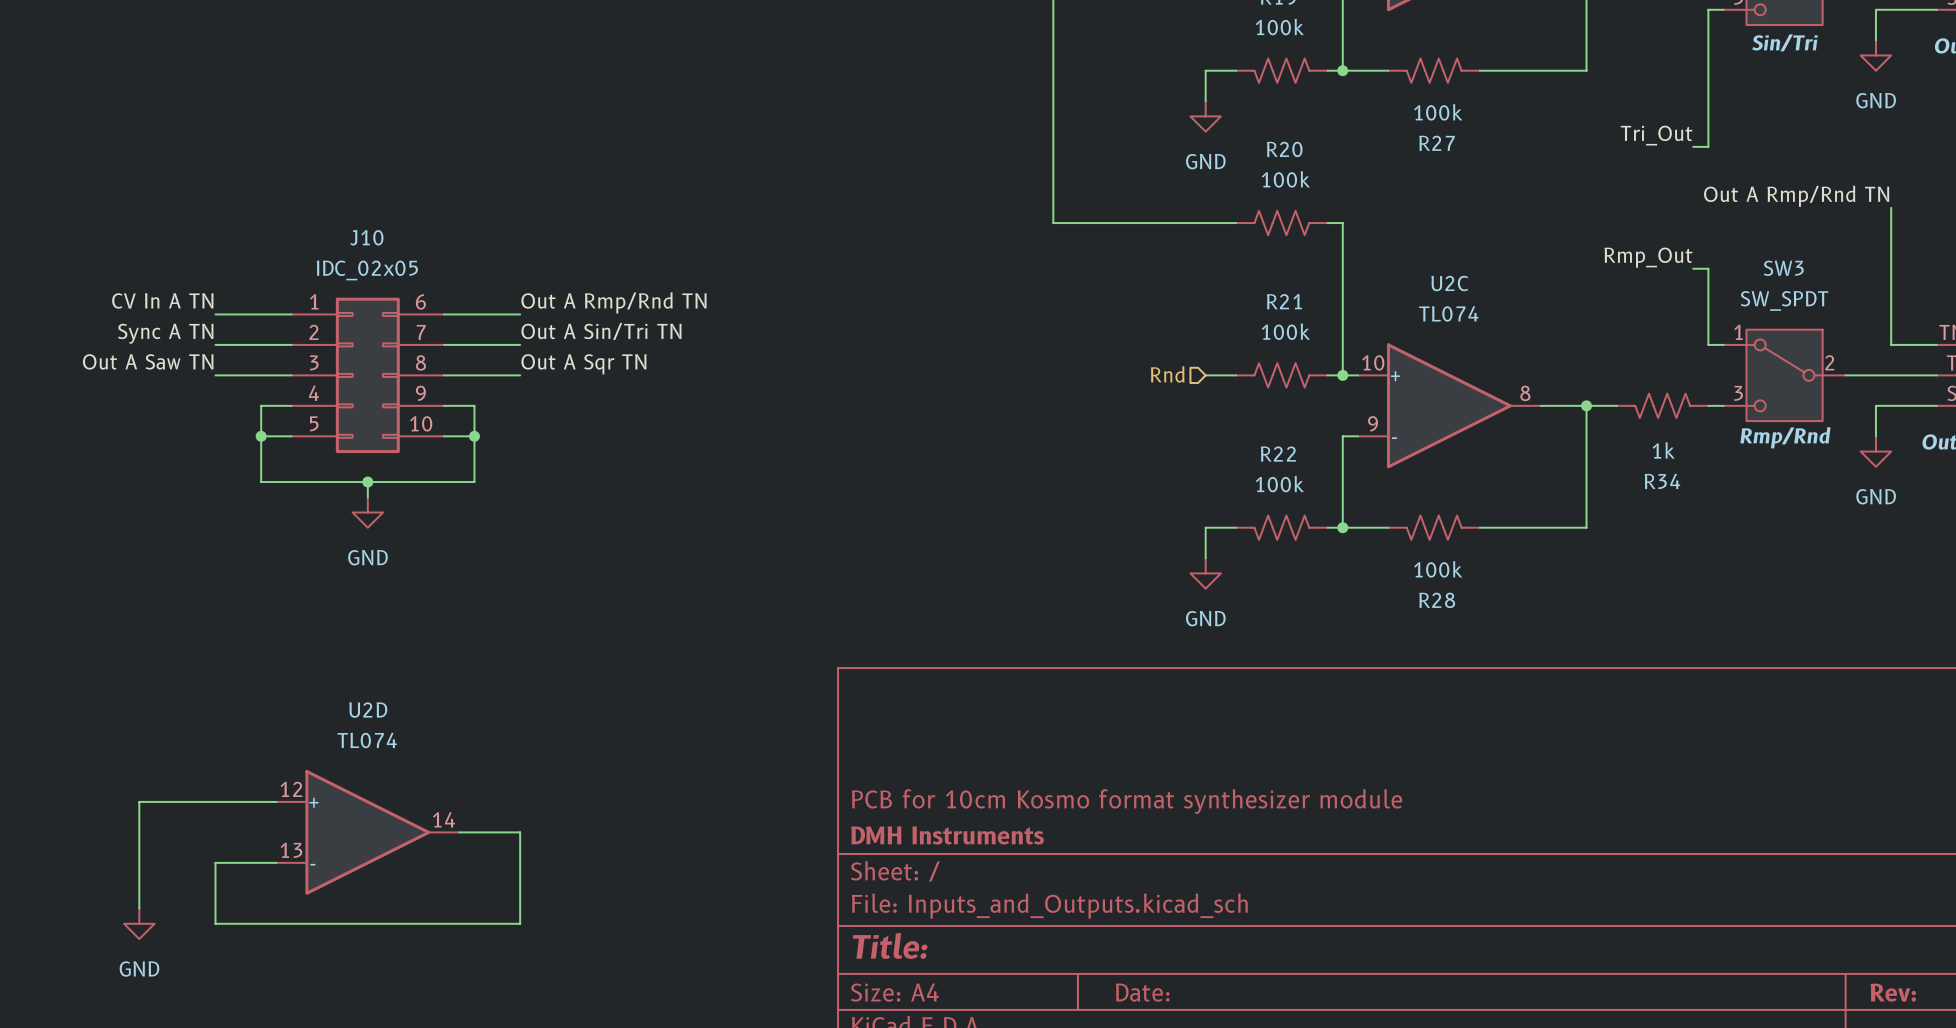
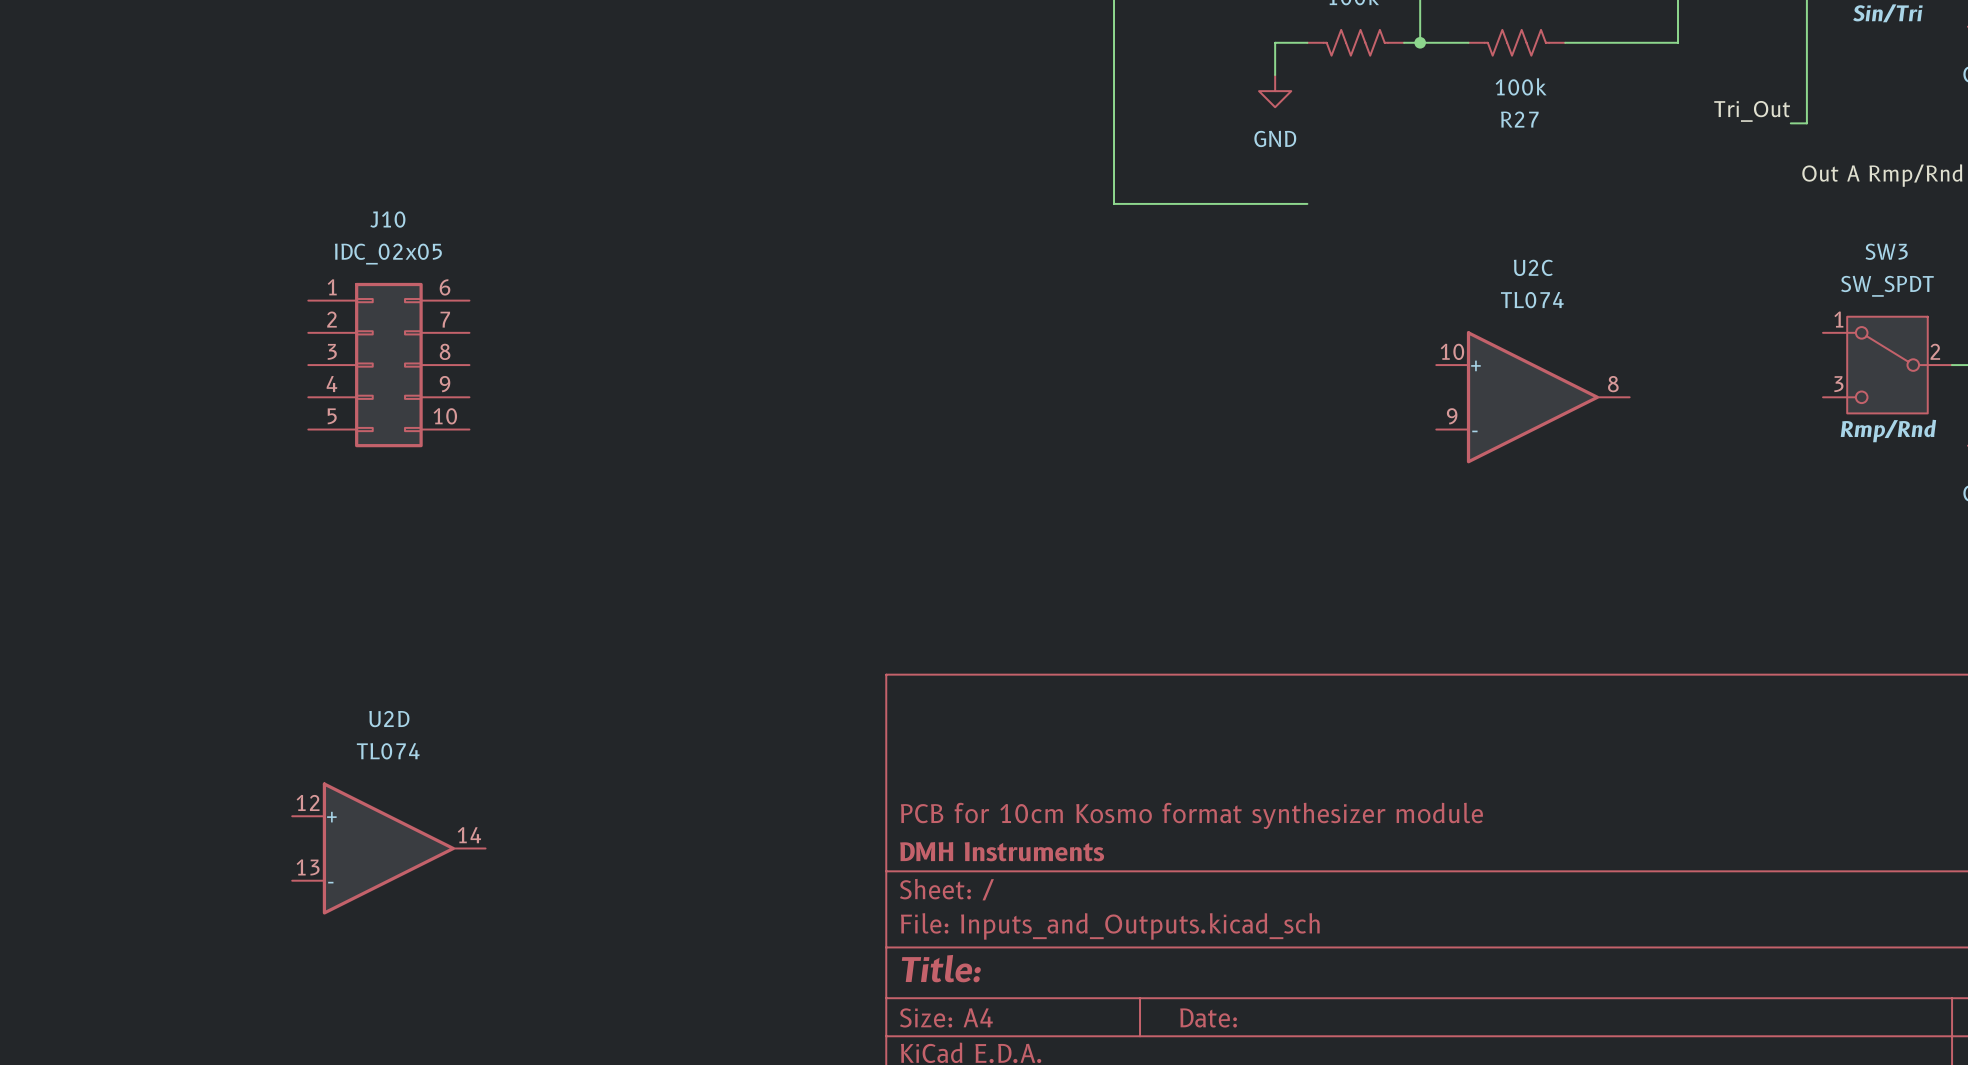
R20: 100k (1281, 223) -> none
wire: (1327, 223) (1342, 223) (1342, 375) -> none
label: Rmp_Out (1648, 257) -> none
wire: (1693, 268) (1708, 268) (1708, 344) (1723, 344) -> none
label: CV In A TN (162, 300) -> none
label: Out A Rmp/Rnd TN (613, 302) -> none
wire: (215, 314) (291, 314) -> none
wire: (443, 314) (520, 314) -> none
label: Out A Sin/Tri TN (601, 331) -> none
label: Sync A TN (165, 333) -> none
wire: (215, 344) (291, 344) -> none
wire: (443, 344) (520, 344) -> none
label: Out A Saw TN (148, 361) -> none
label: Out A Sqr TN (583, 364) -> none
hierarchical label: Rnd (1167, 374) -> none
wire: (215, 375) (291, 375) -> none
wire: (443, 375) (520, 375) -> none
wire: (1205, 375) (1236, 375) -> none
R21: 100k (1281, 375) -> none
wire: (1327, 375) (1358, 375) -> none
junction: (1342, 375) -> none
wire: (291, 405) (261, 405) (261, 482) (474, 482) (474, 405) (443, 405) -> none
wire: (1540, 405) (1616, 405) -> none
wire: (1586, 405) (1586, 527) (1479, 527) -> none
junction: (1586, 405) -> none
R34: 1k (1662, 405) -> none
wire: (1708, 405) (1723, 405) -> none
wire: (261, 436) (291, 436) -> none
junction: (261, 436) -> none
wire: (443, 436) (474, 436) -> none
junction: (474, 436) -> none
wire: (1358, 436) (1342, 436) (1342, 527) -> none
wire: (367, 482) (367, 497) -> none
junction: (367, 482) -> none
power symbol: GND (367, 512) -> none
wire: (1236, 527) (1205, 527) (1205, 558) -> none
R22: 100k (1281, 527) -> none
wire: (1327, 527) (1388, 527) -> none
junction: (1342, 527) -> none
R28: 100k (1434, 527) -> none
power symbol: GND (1205, 573) -> none
wire: (276, 801) (139, 801) (139, 908) -> none
wire: (459, 832) (520, 832) (520, 923) (215, 923) (215, 862) (276, 862) -> none
power symbol: GND (139, 923) -> none

